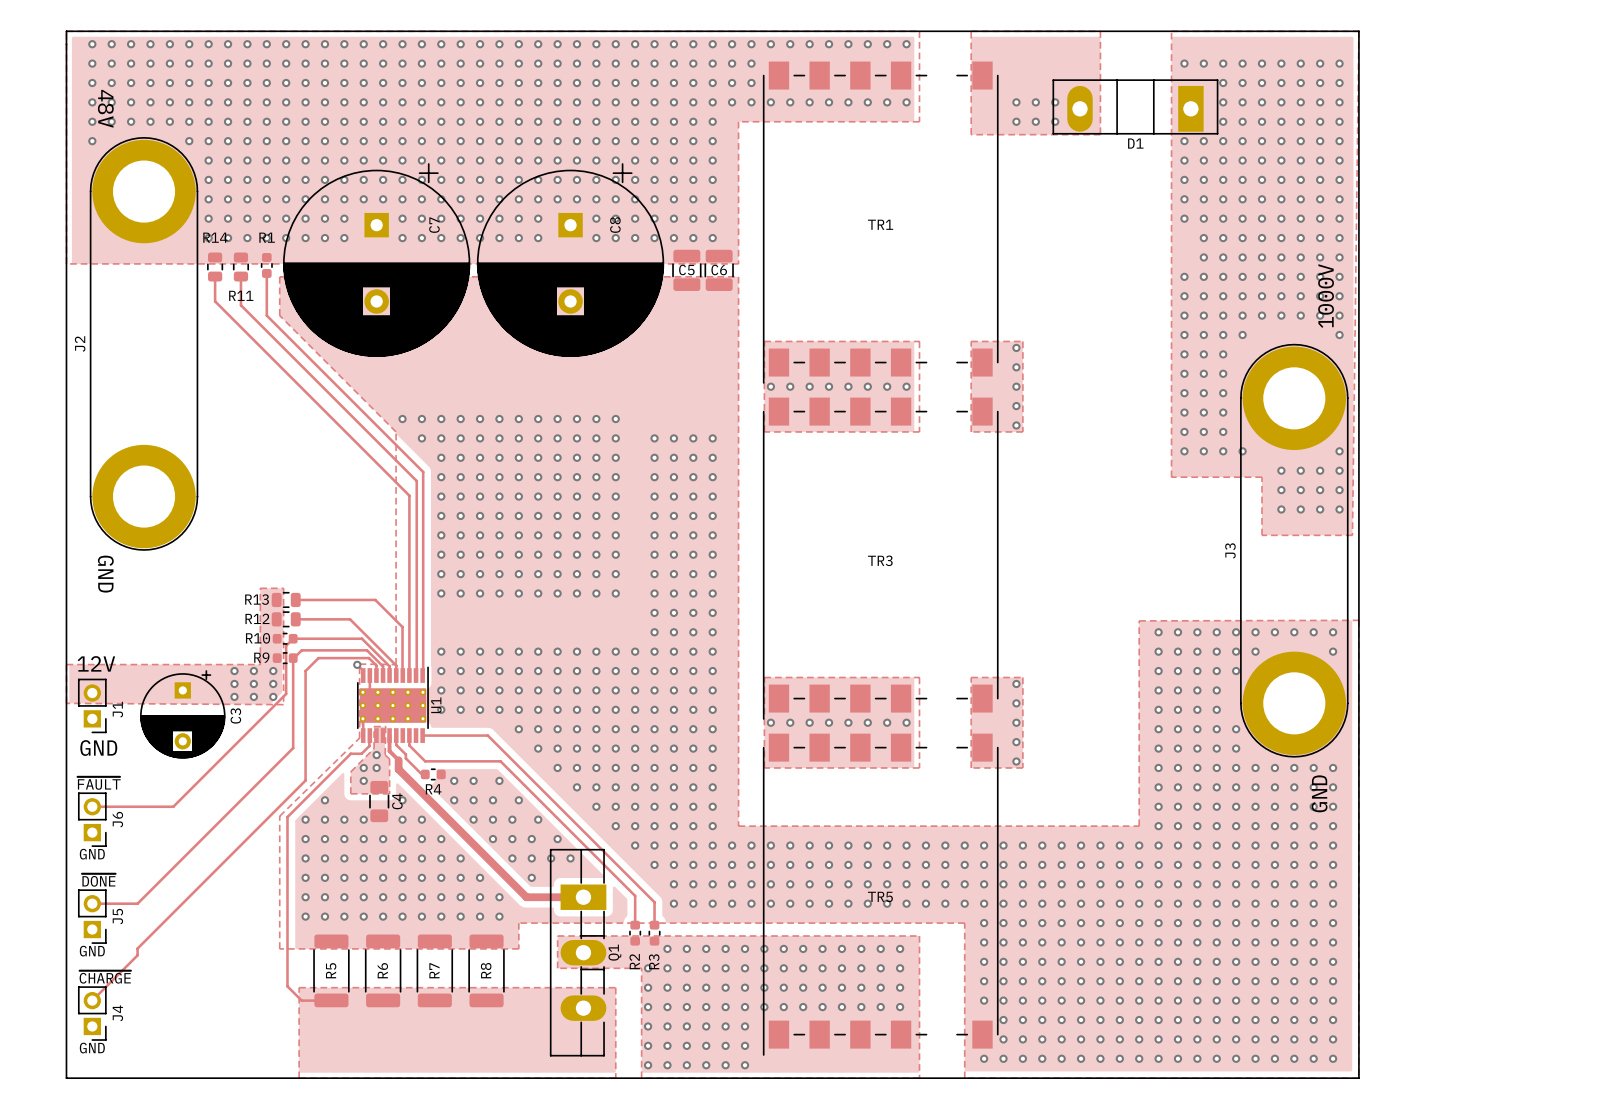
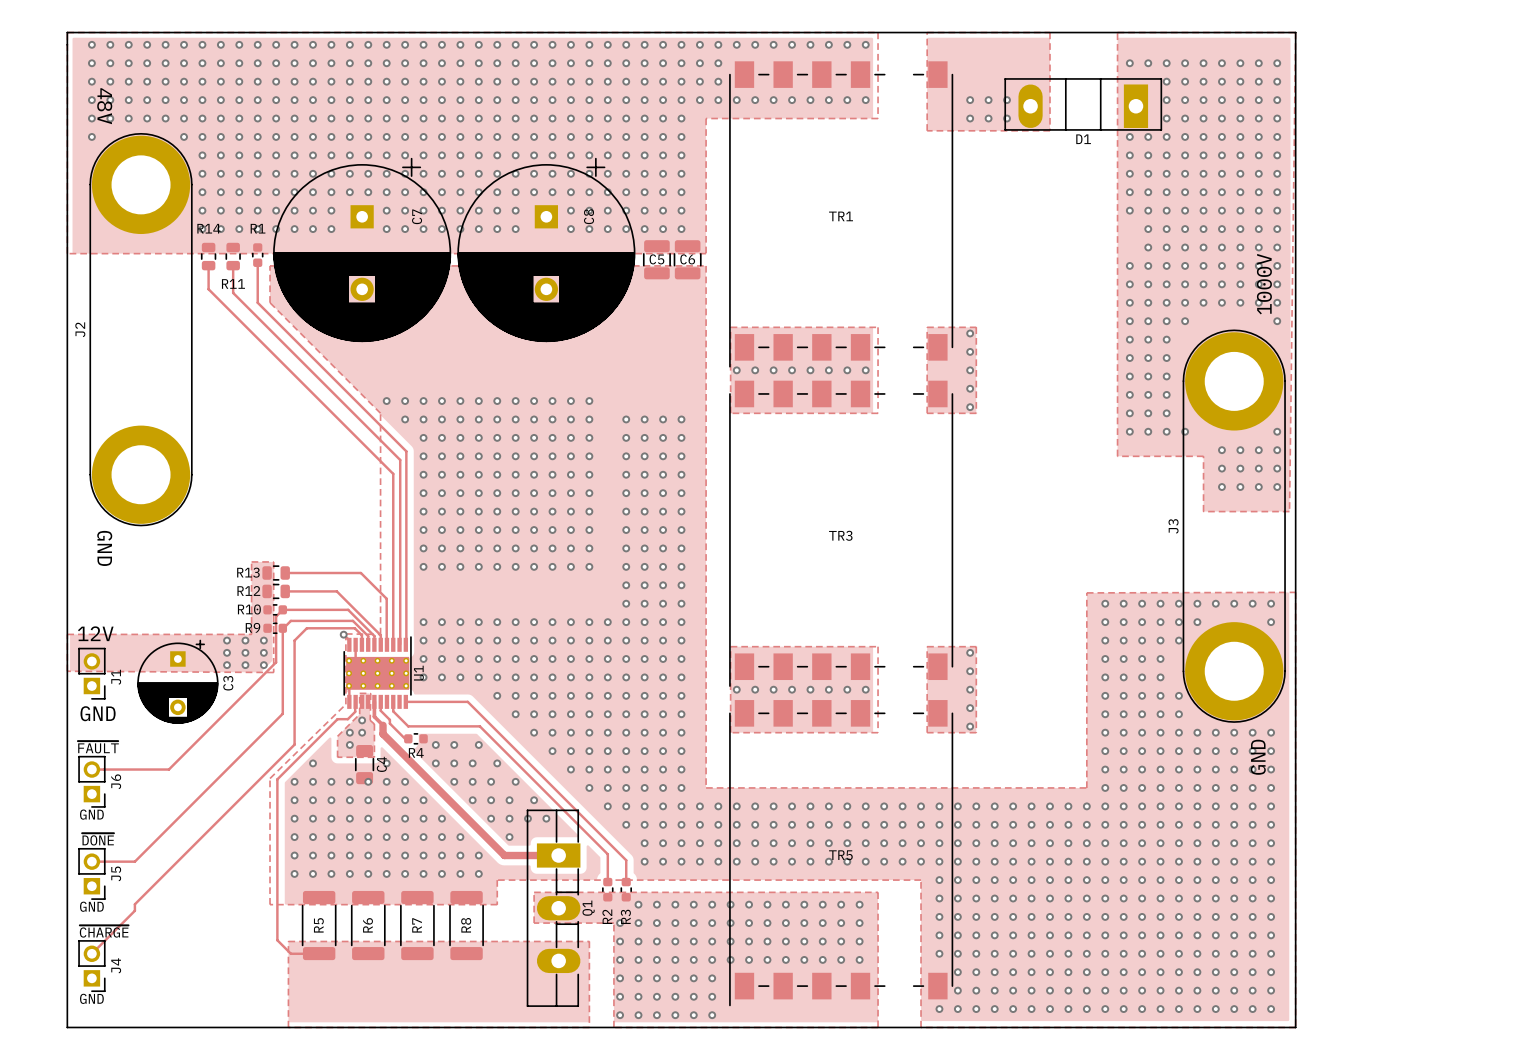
via: none -> (368, 781)

